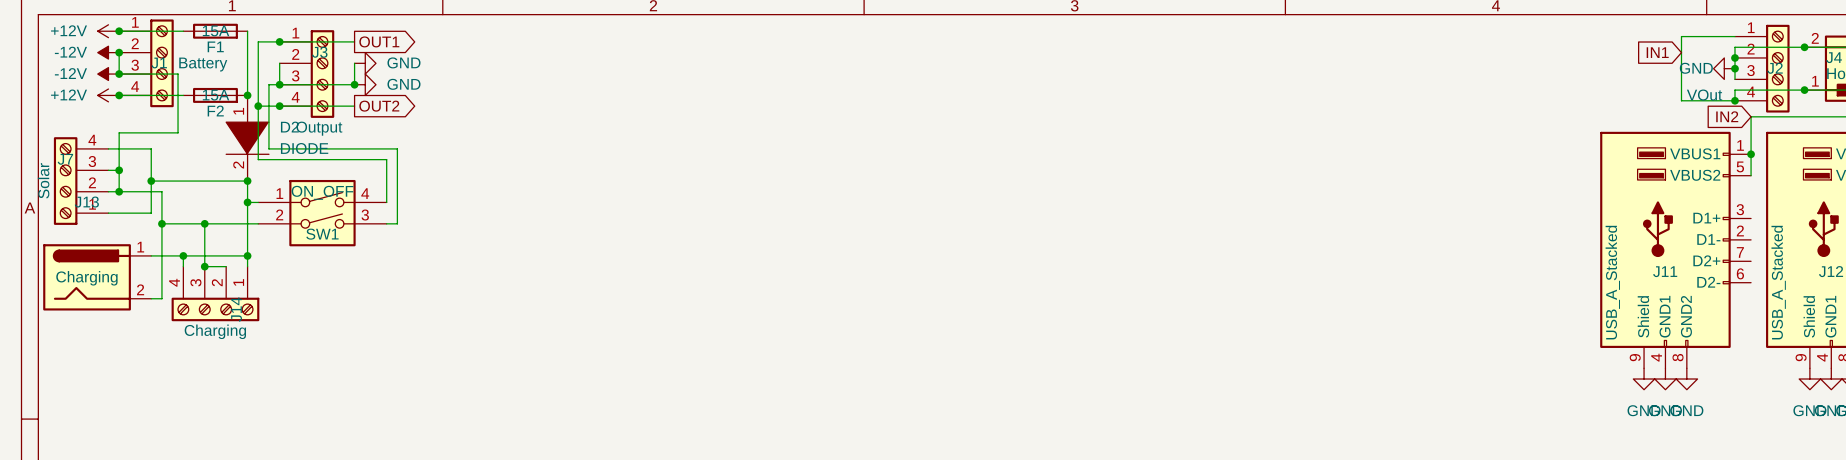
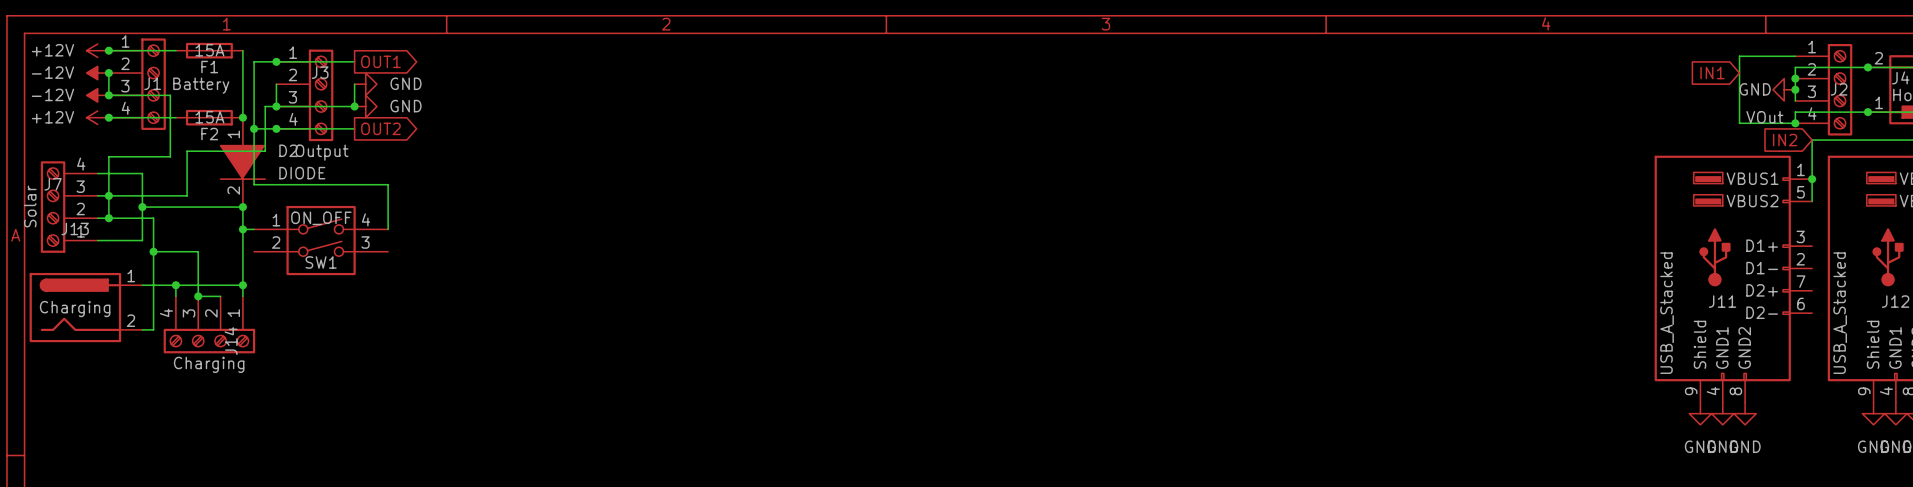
wire: (268, 127) (268, 148) (397, 148) (397, 223) (386, 223) -> (265, 151) (187, 151) (187, 195) (108, 195)
wire: (204, 223) (258, 223) -> none
junction: (204, 223) -> none

